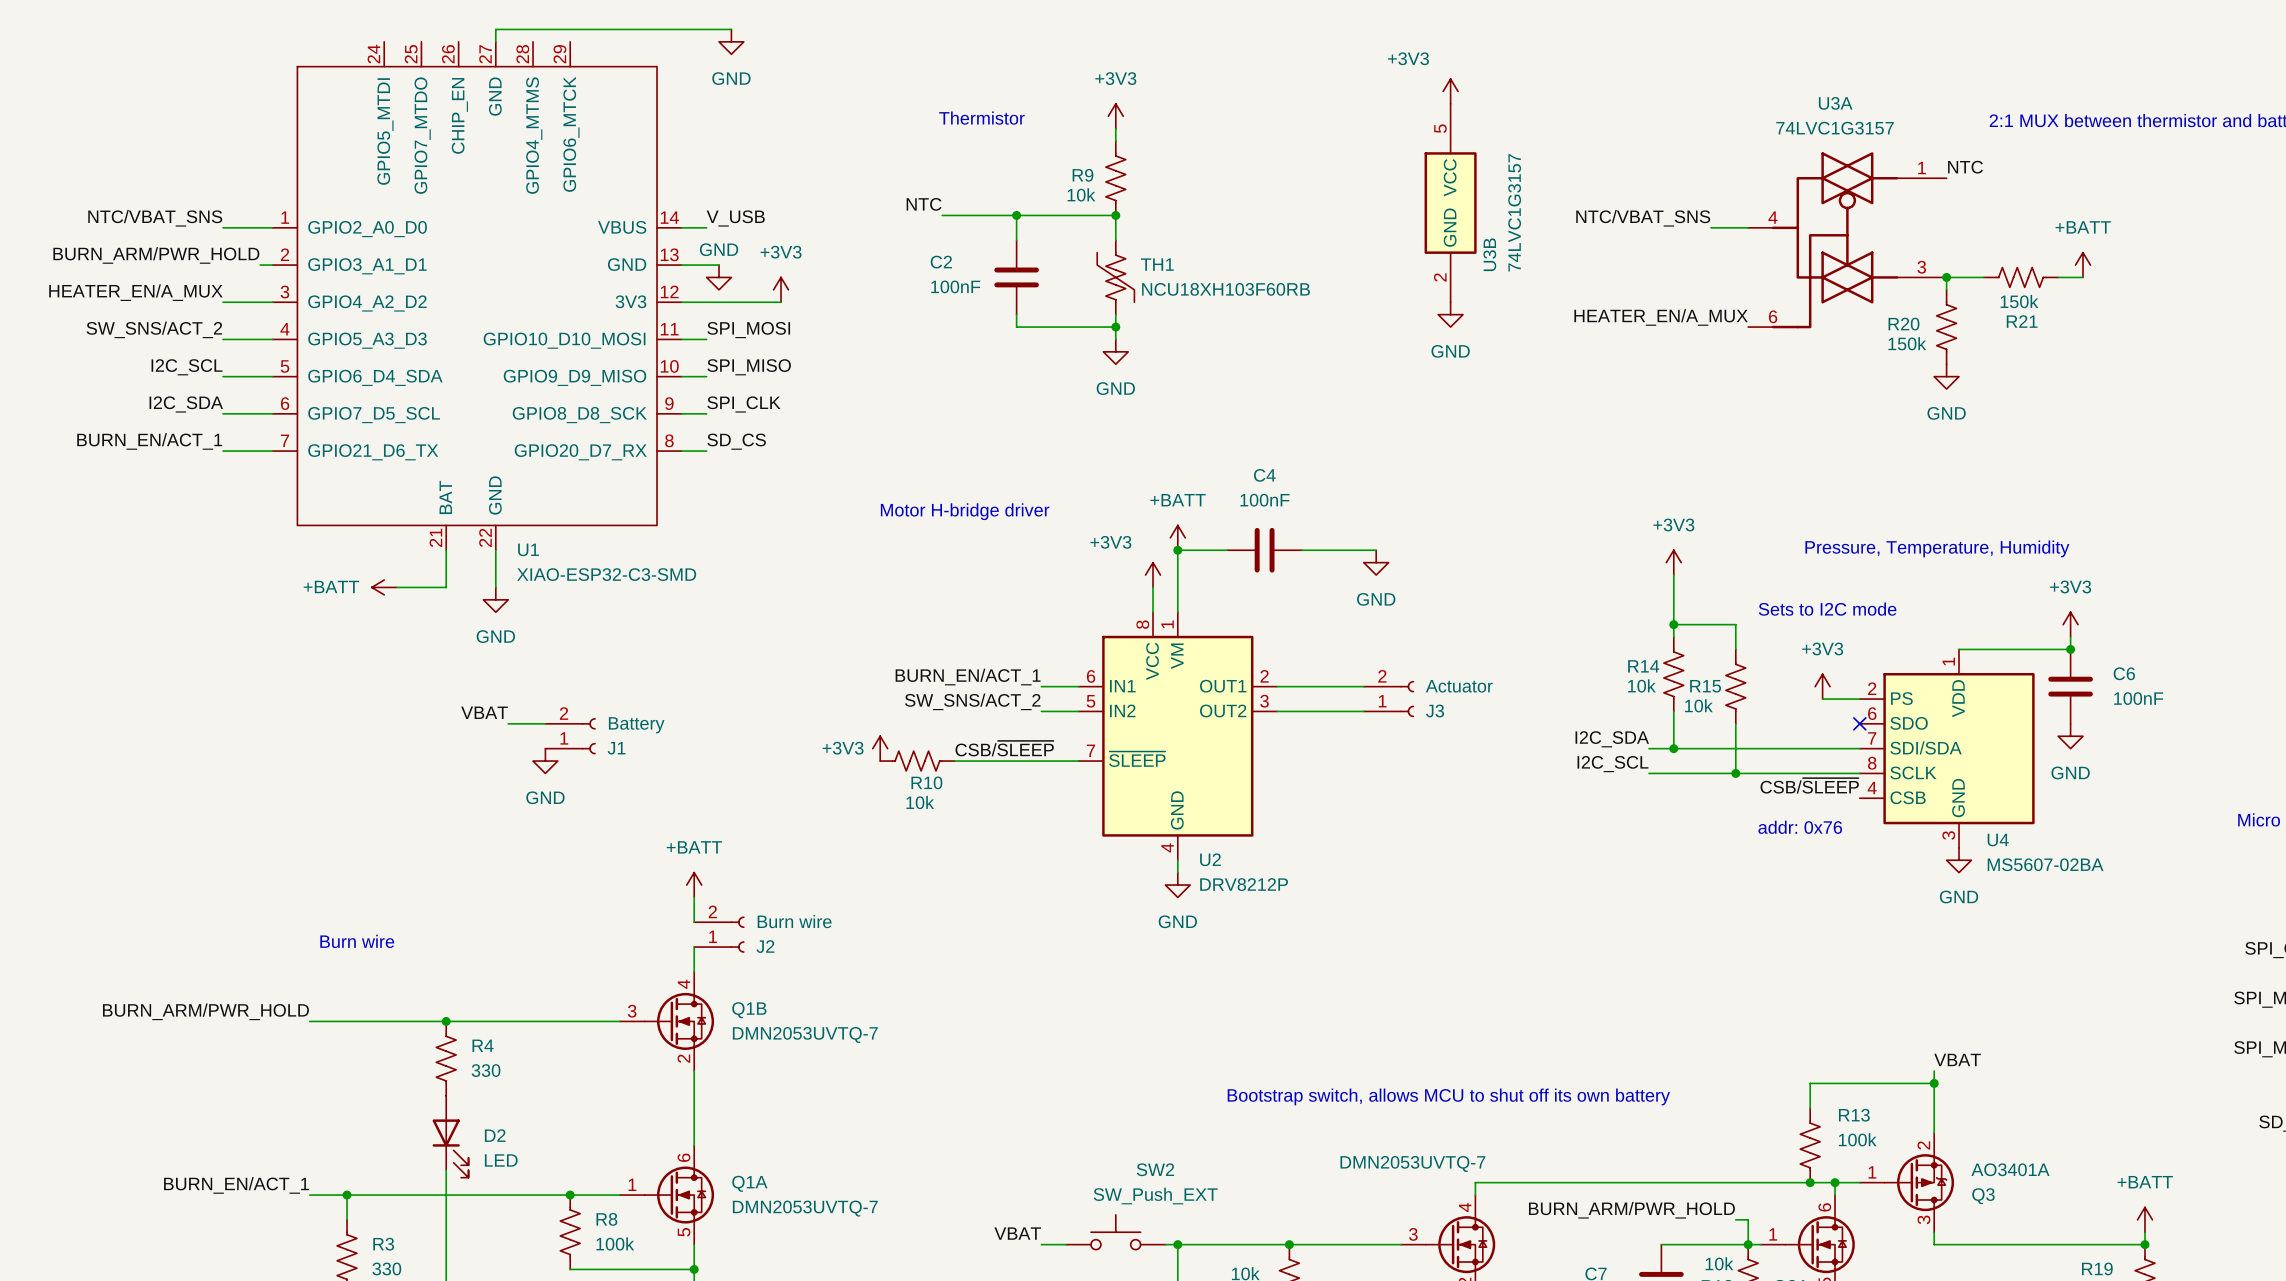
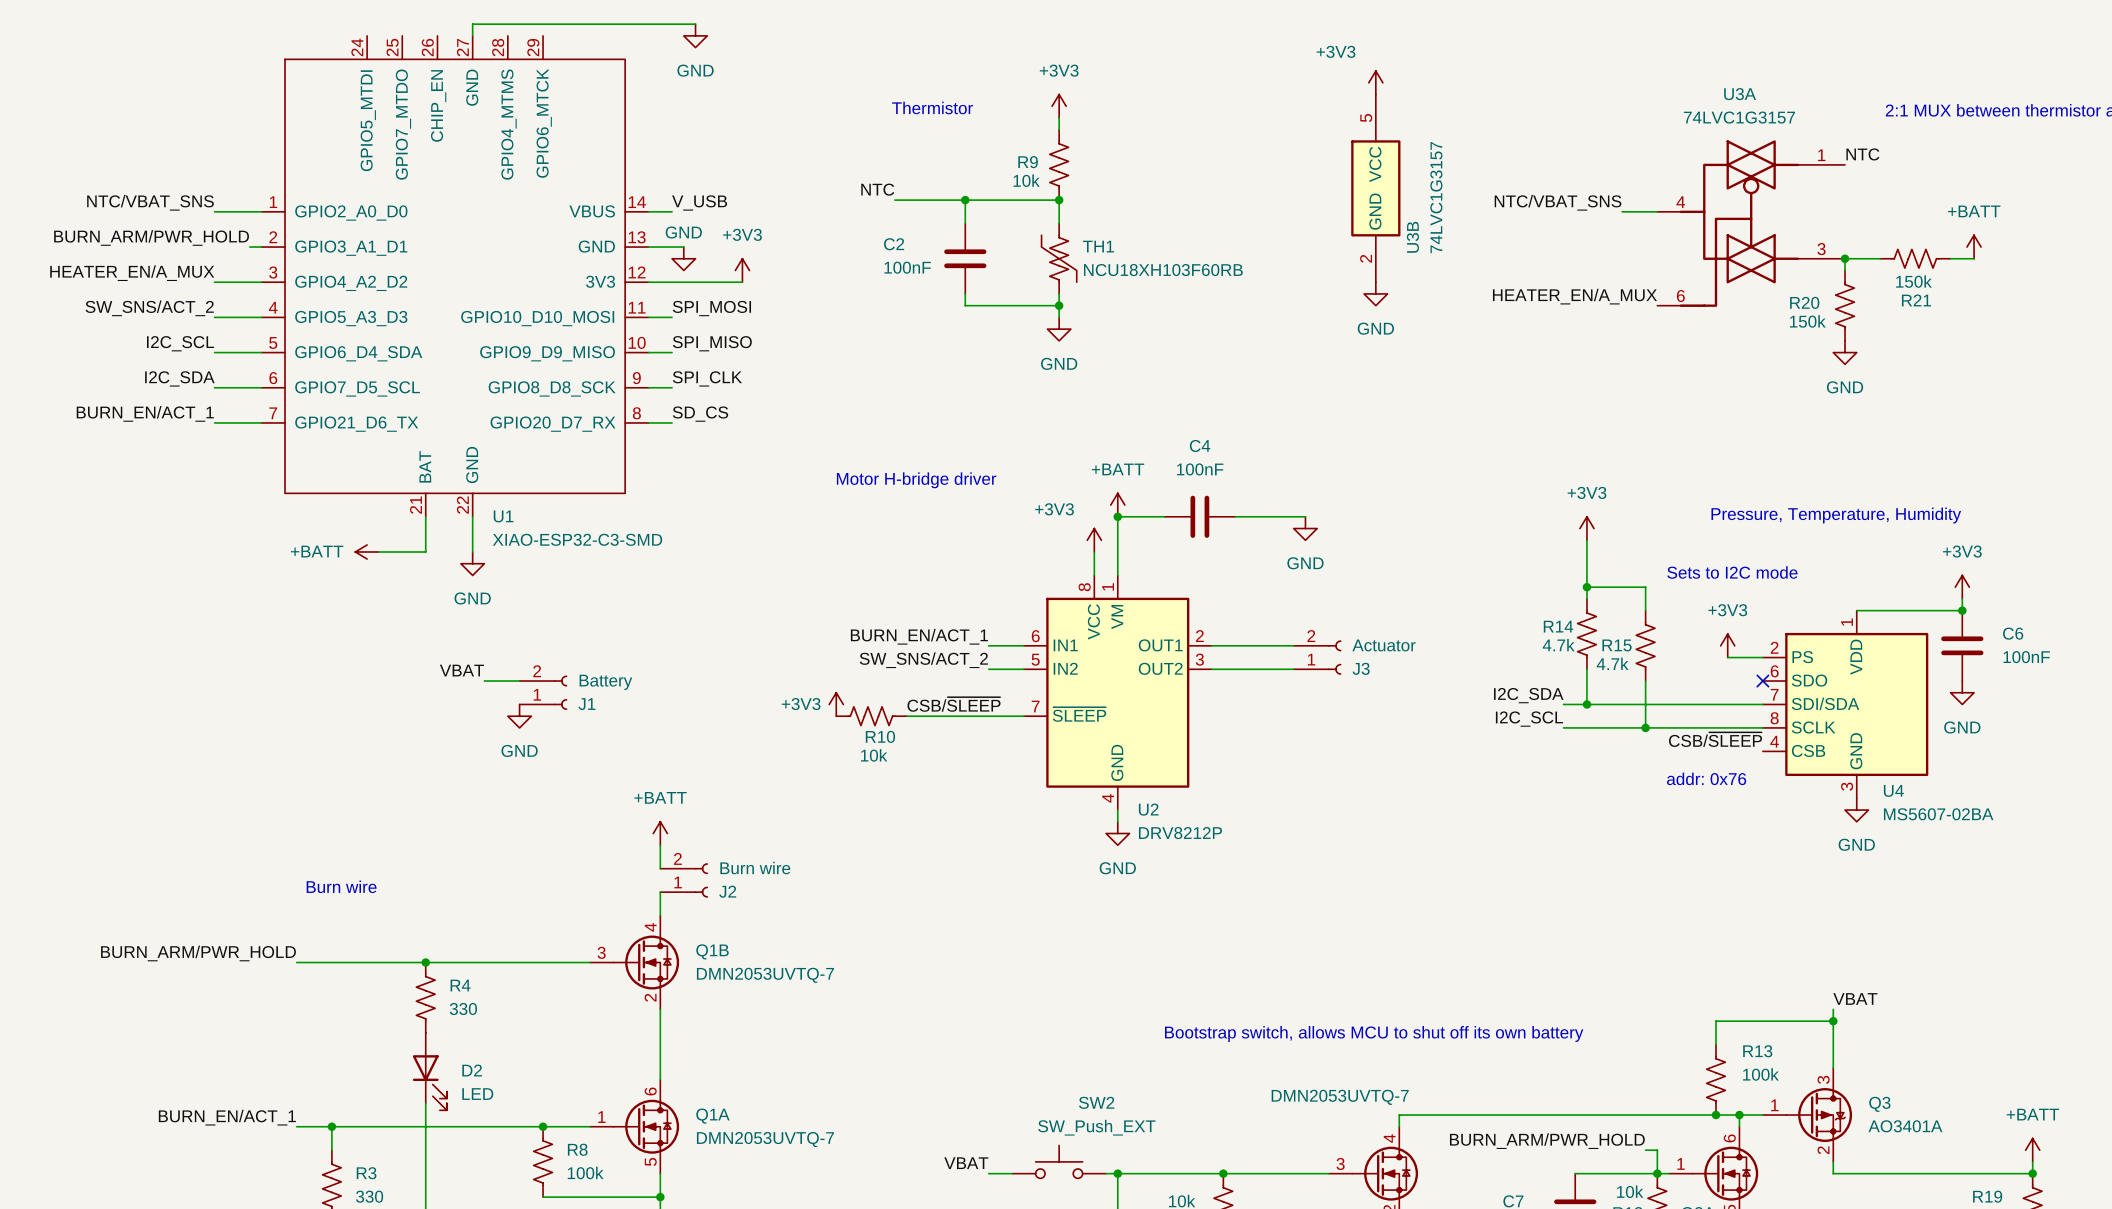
R14 value: 10k (1641, 685) -> 4.7k (1558, 645)
R15 value: 10k (1698, 705) -> 4.7k (1612, 663)
Q3 flip: as is (1919, 1182) -> up-down (1819, 1115)

